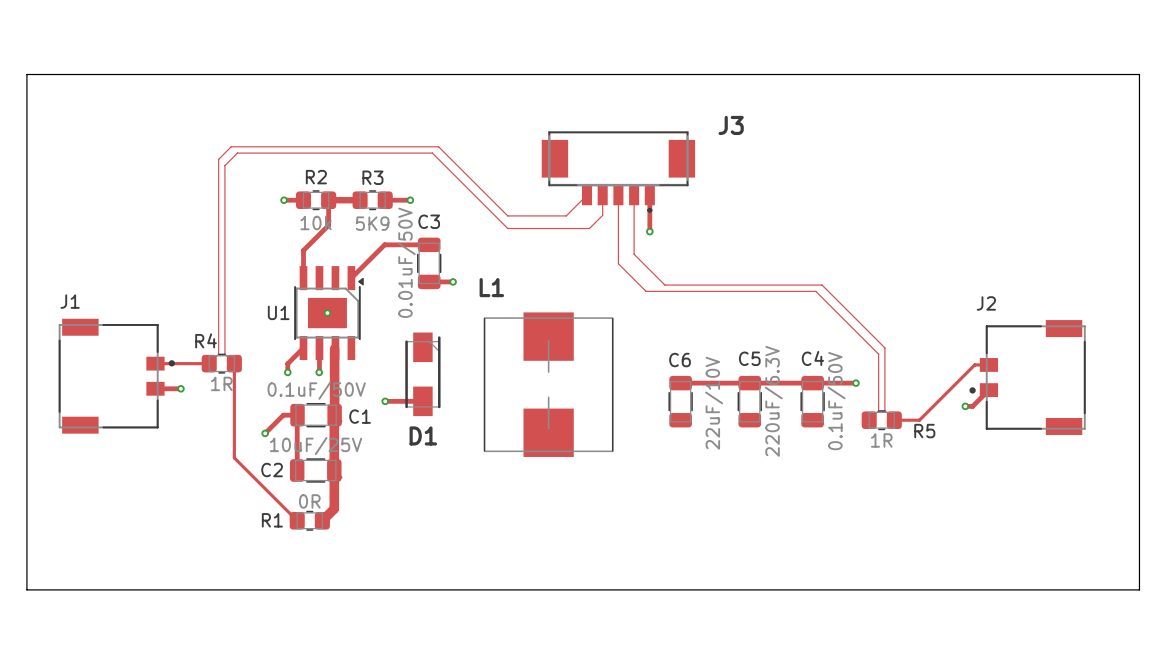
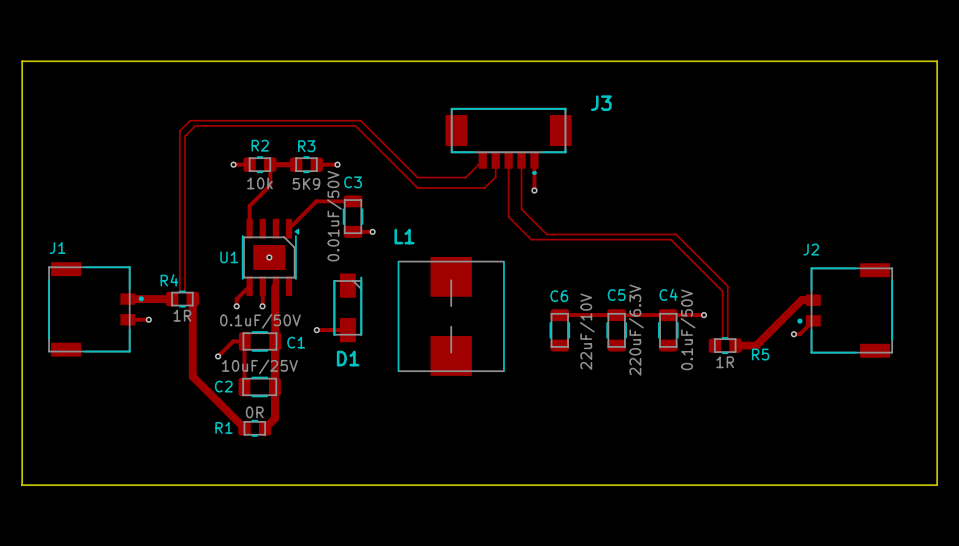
track width: thin (155, 363) (209, 363) -> thick (127, 299) (172, 299)
track width: thin (234, 363) (234, 457) (297, 520) -> thick (192, 299) (192, 376) (244, 428)
track width: thin (988, 364) (974, 364) (919, 420) (894, 420) -> thick (813, 300) (801, 300) (756, 345) (735, 345)

